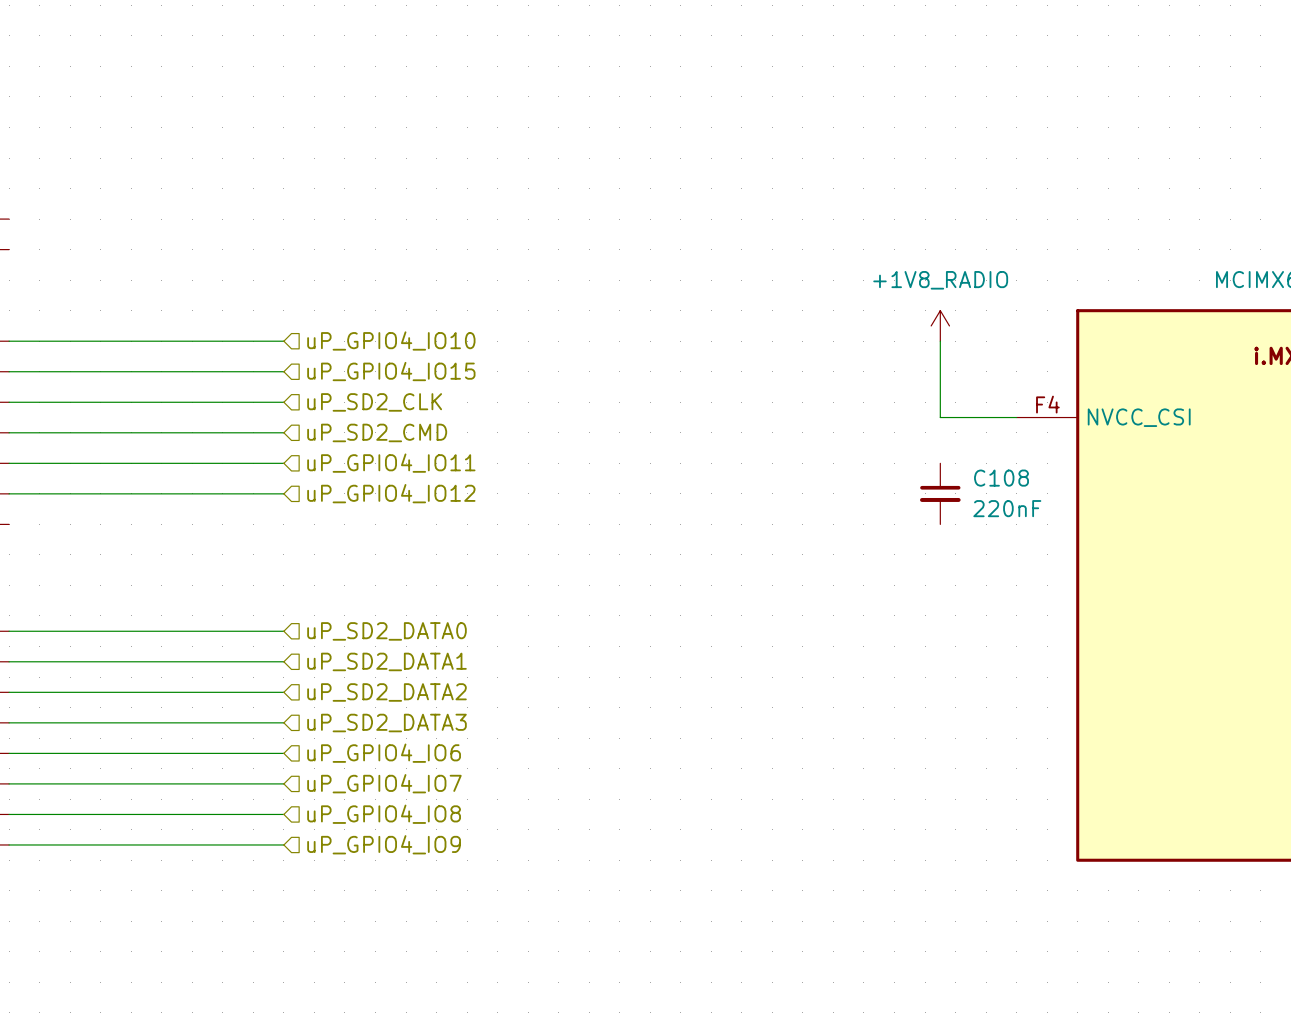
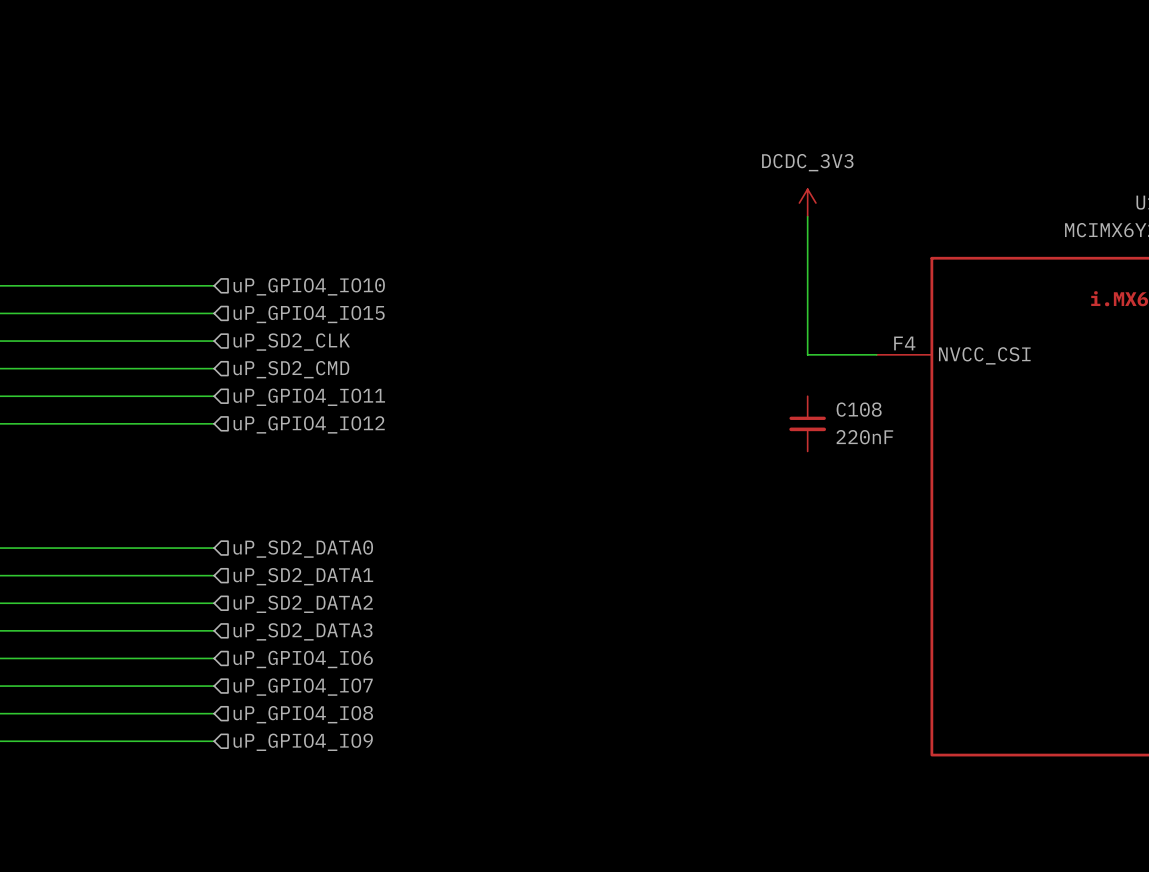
power symbol: none -> DCDC_3V3 (807, 203)
wire: none -> (807, 216) (807, 285)
power symbol: +1V8_RADIO (940, 325) -> none

